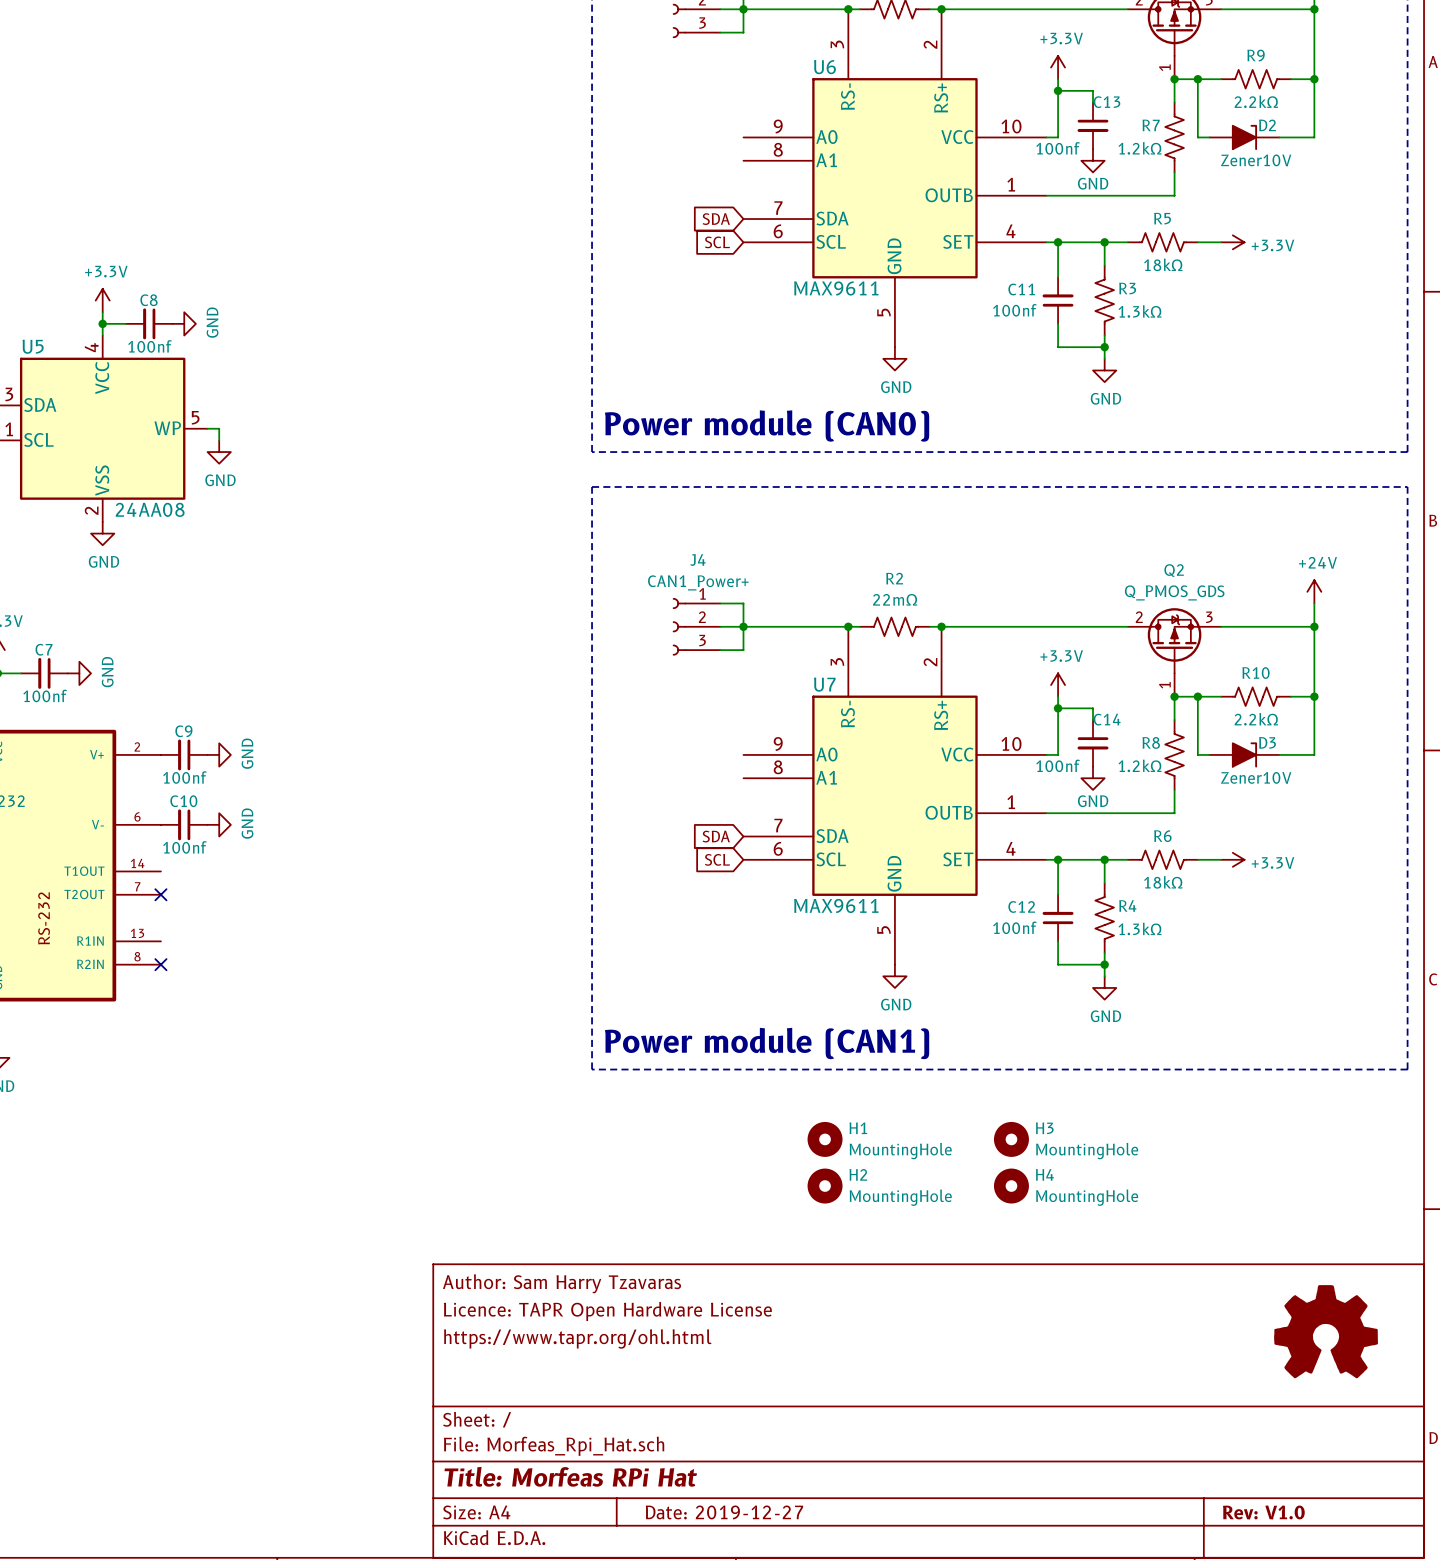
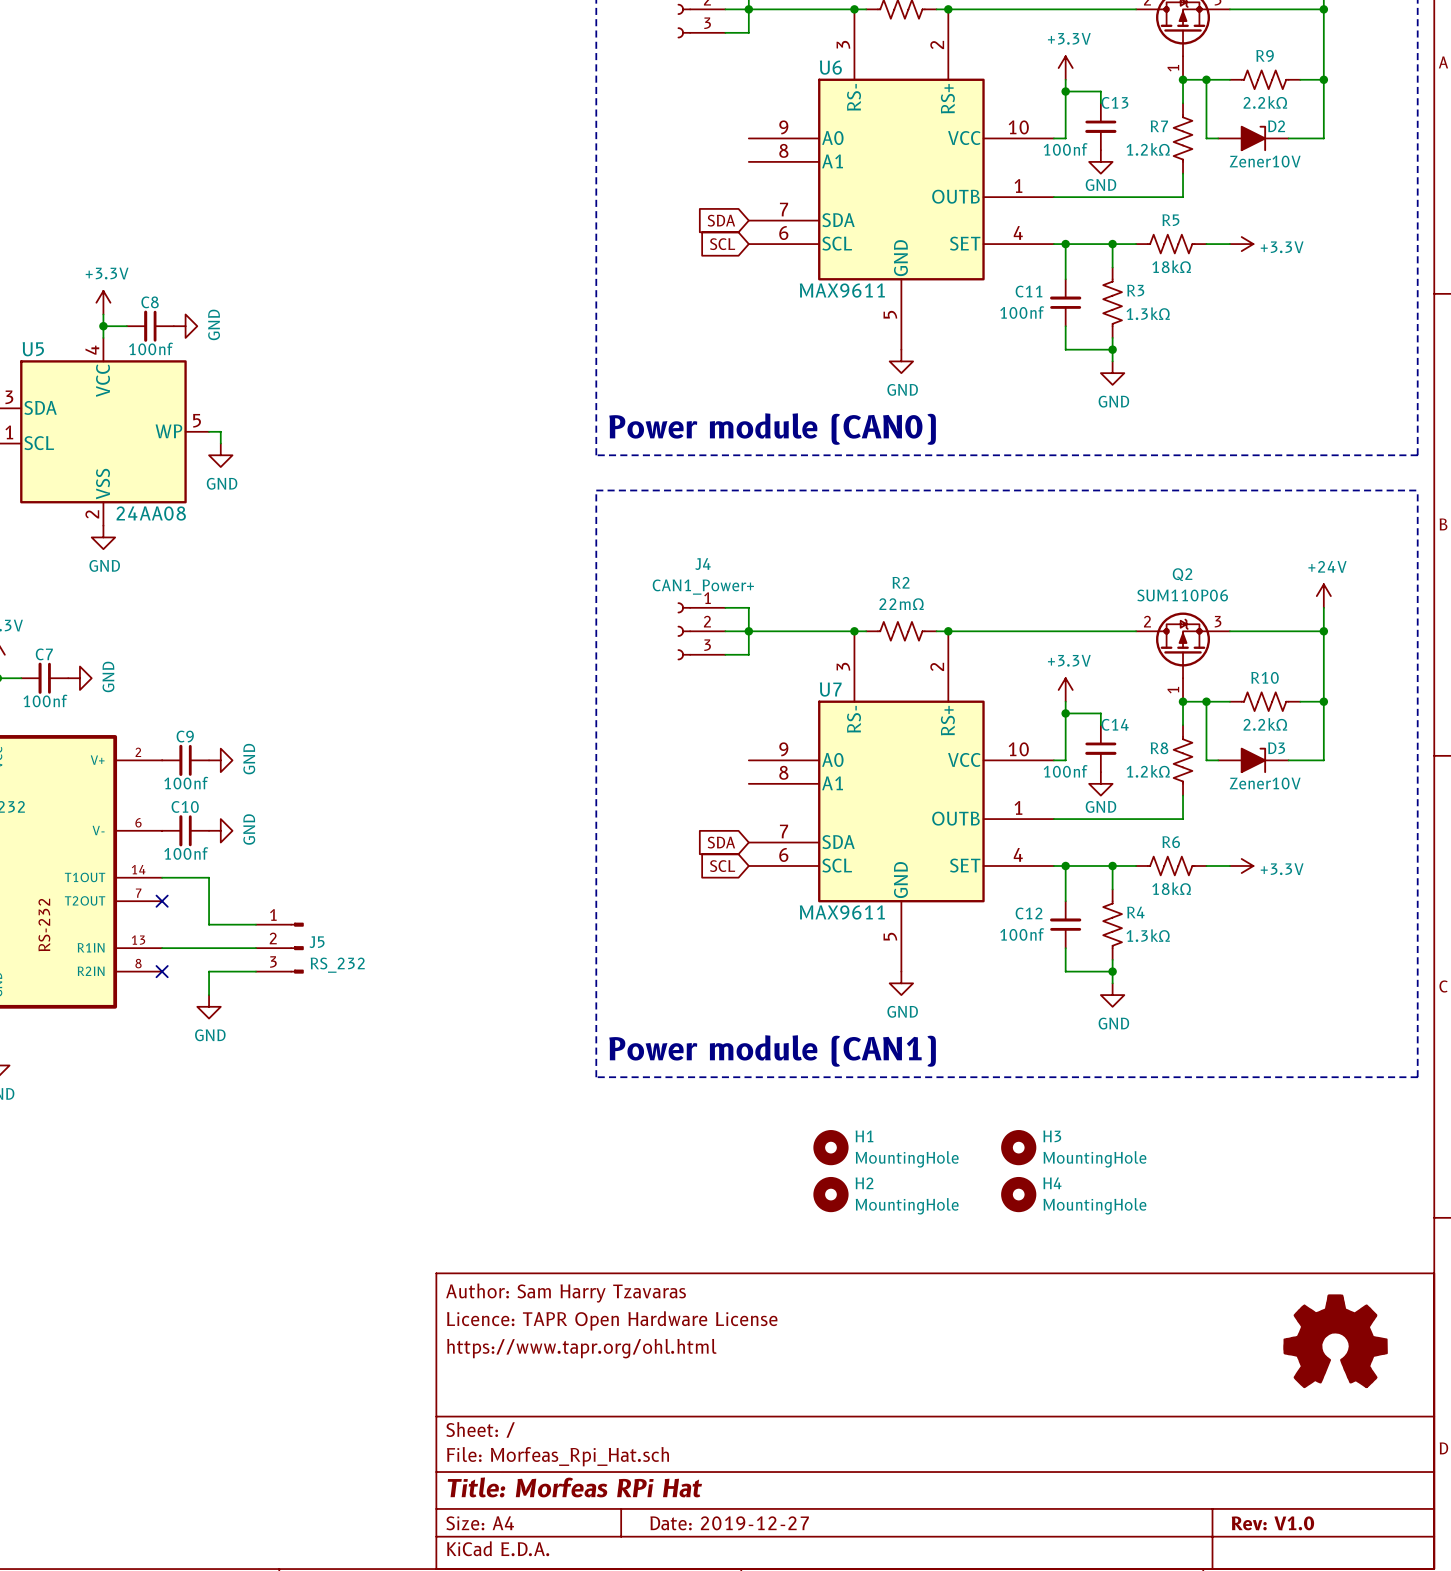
Q2 value: Q_PMOS_GDS (1174, 592) -> SUM110P06 (1182, 595)
wire: none -> (162, 877) (209, 877) (209, 924) (255, 924)
wire: none -> (162, 948) (255, 948)
J5: none -> RS_232 (279, 948)
wire: none -> (255, 971) (209, 971) (209, 995)
power symbol: none -> GND (209, 1006)

